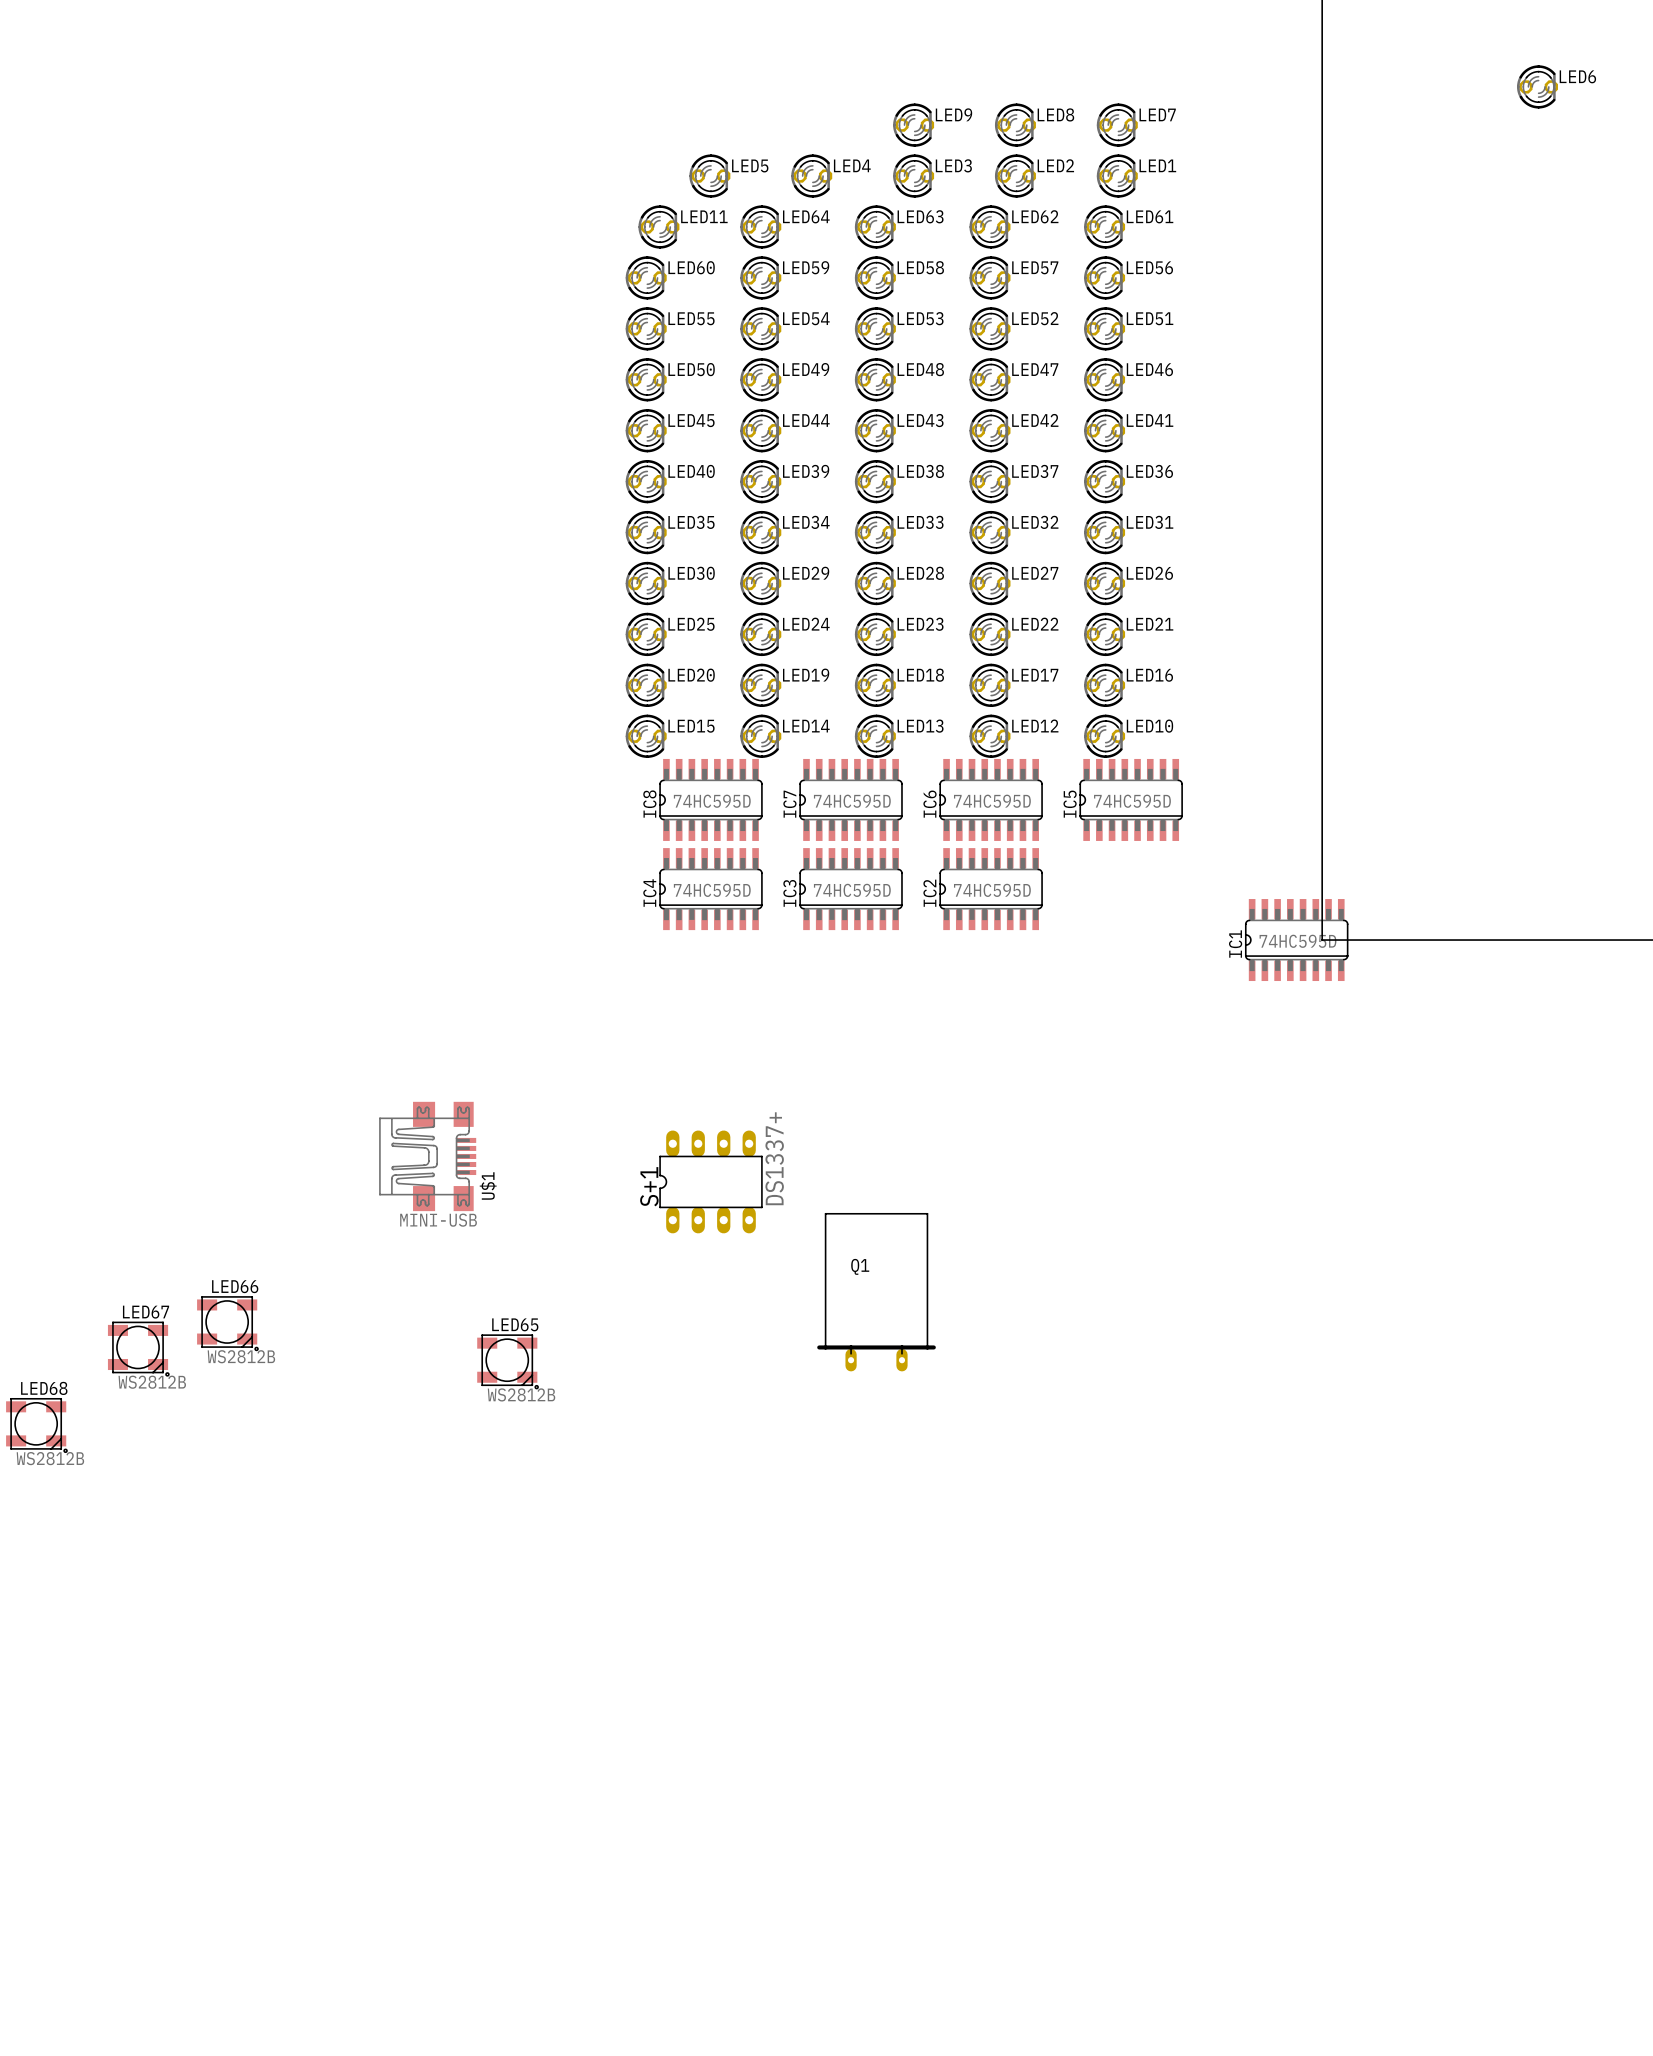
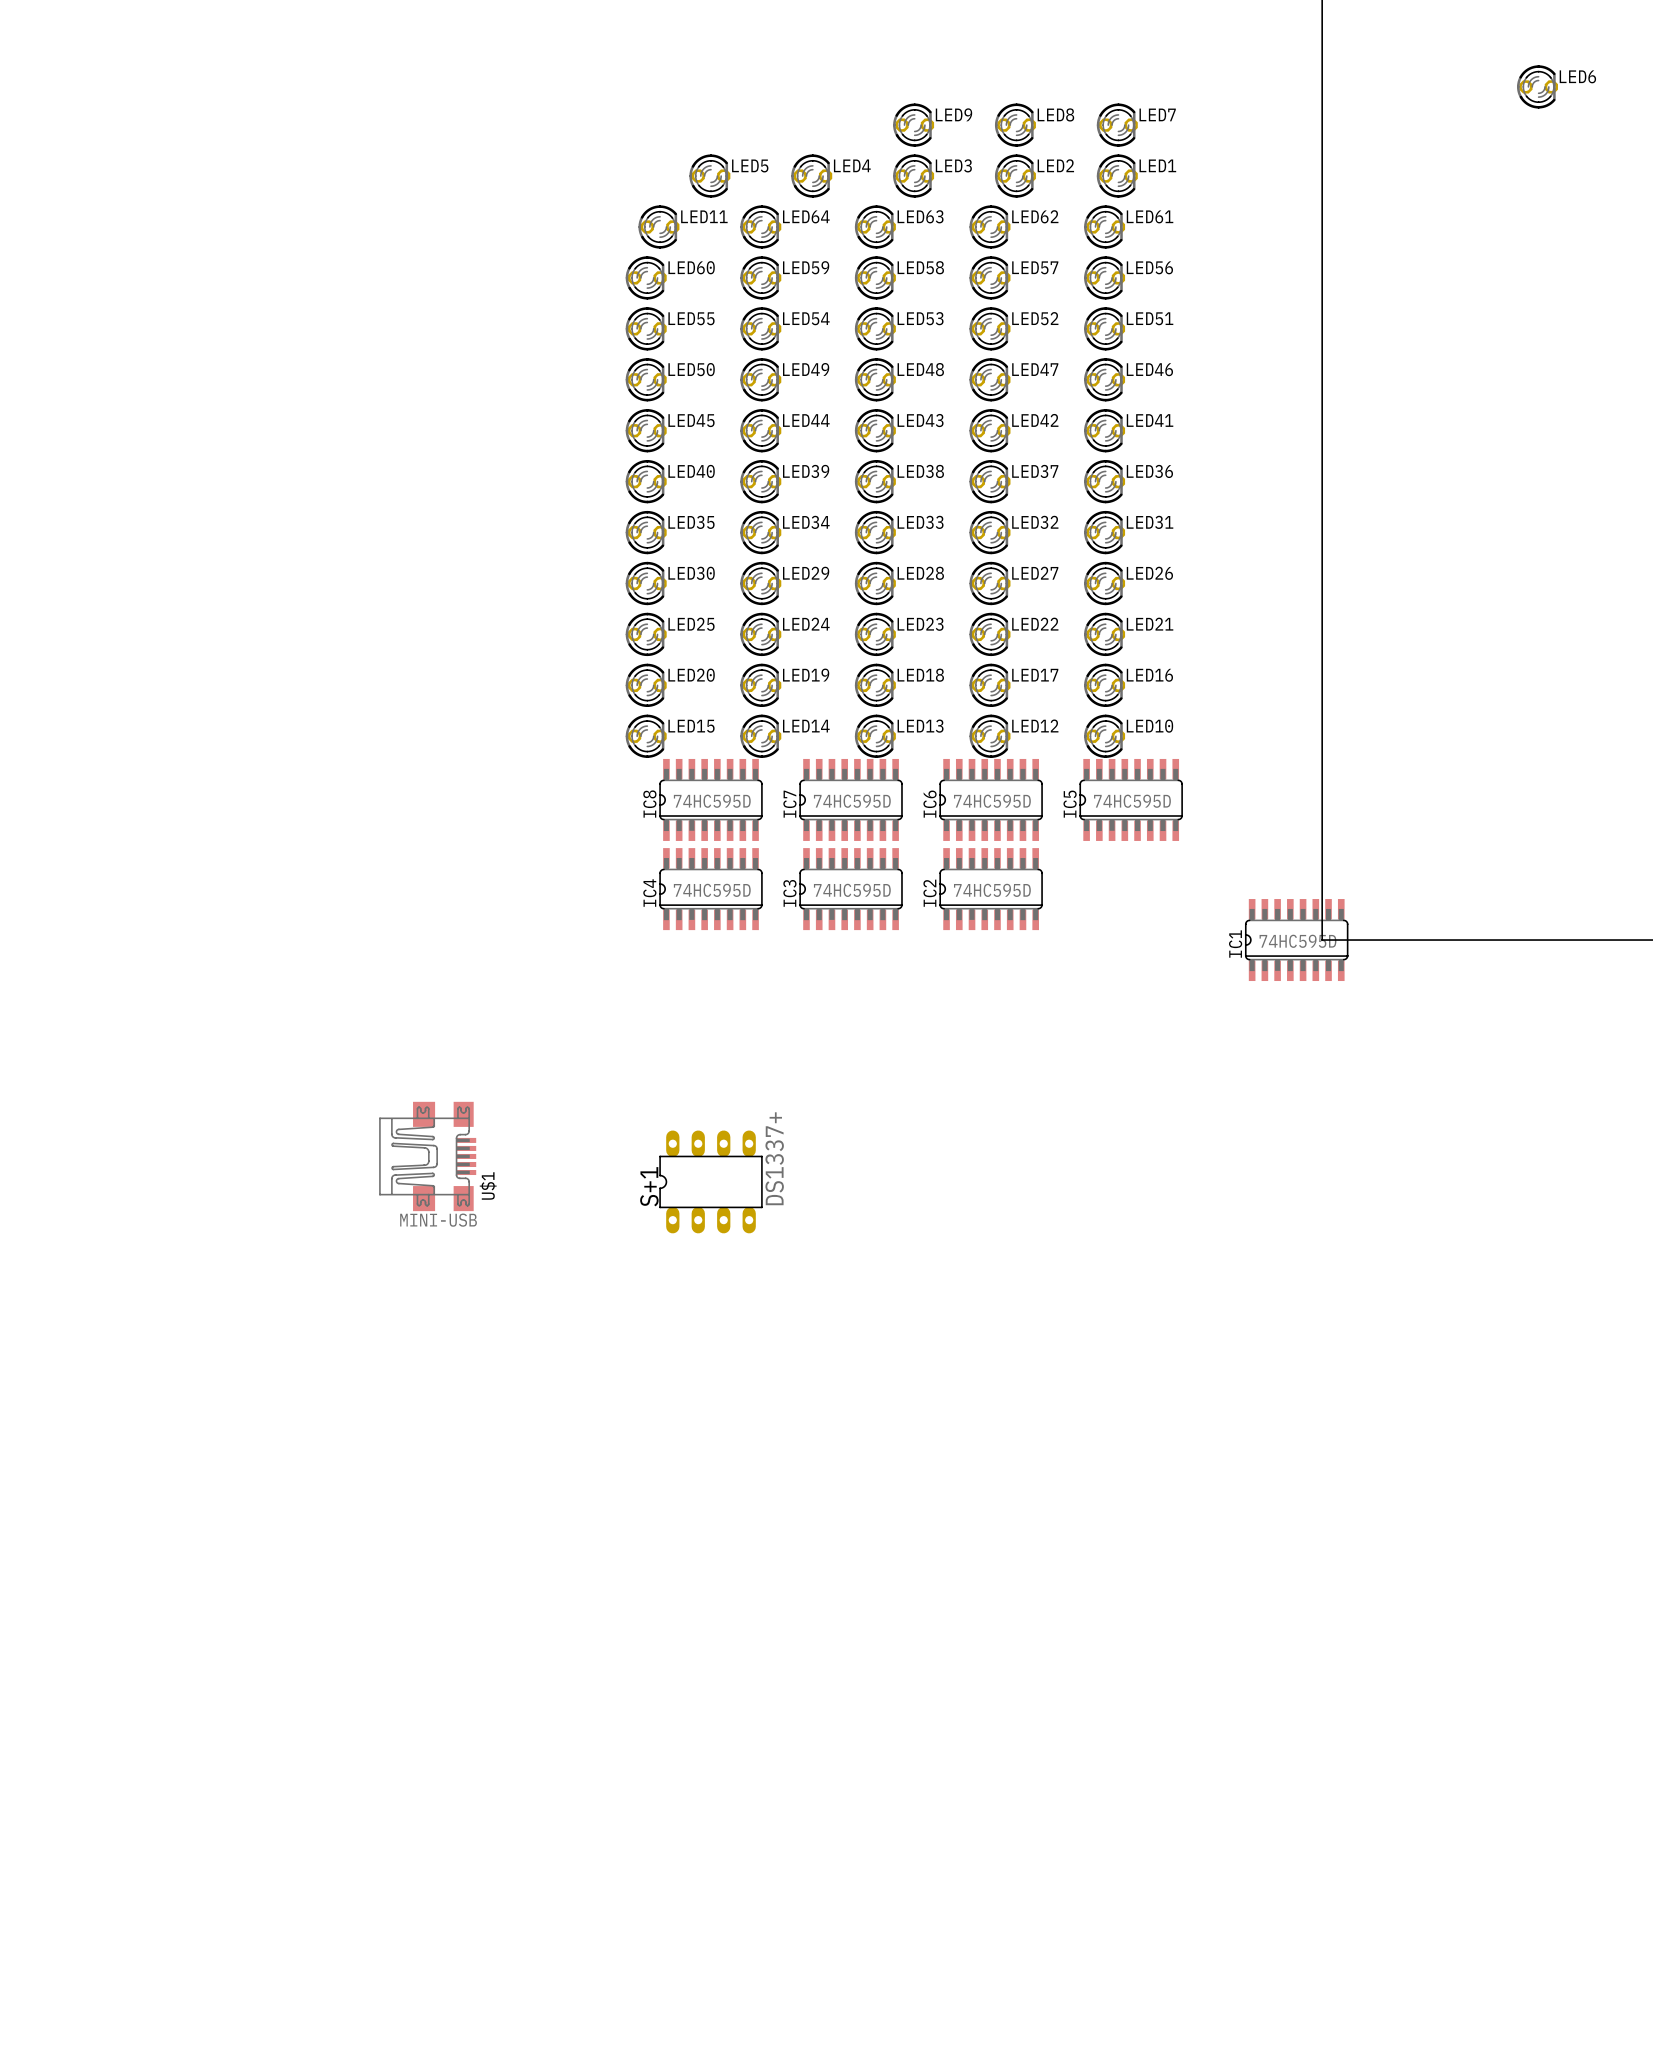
Q1: (876, 1292) -> none
LED66: WS2812B (227, 1323) -> none
LED67: WS2812B (138, 1349) -> none
LED65: WS2812B (507, 1361) -> none
LED68: WS2812B (36, 1425) -> none

